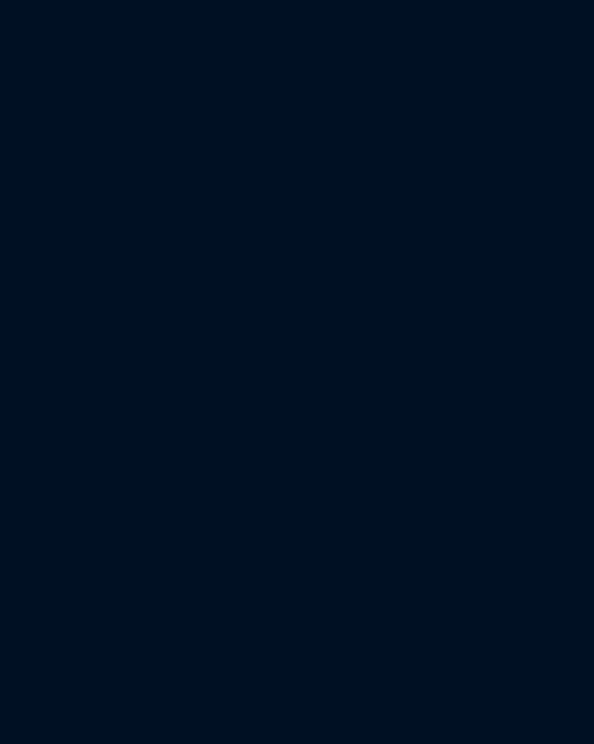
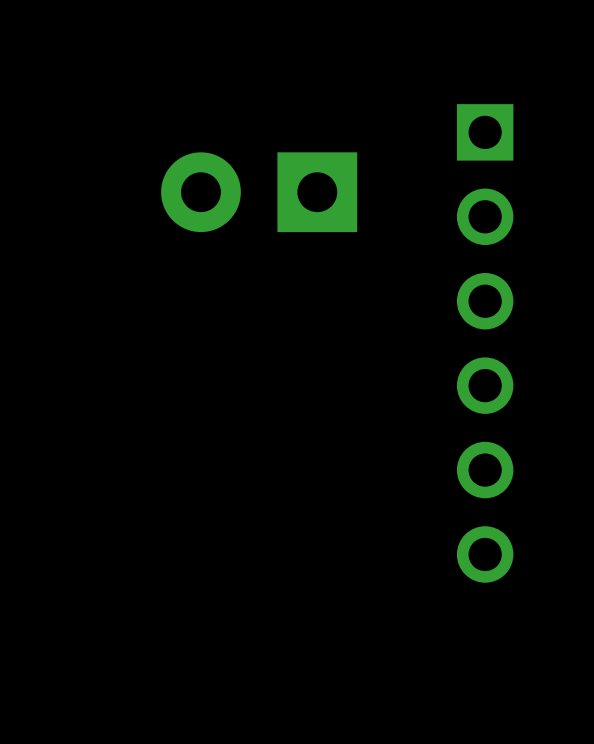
part: none -> (259, 192)
part: none -> (485, 343)

